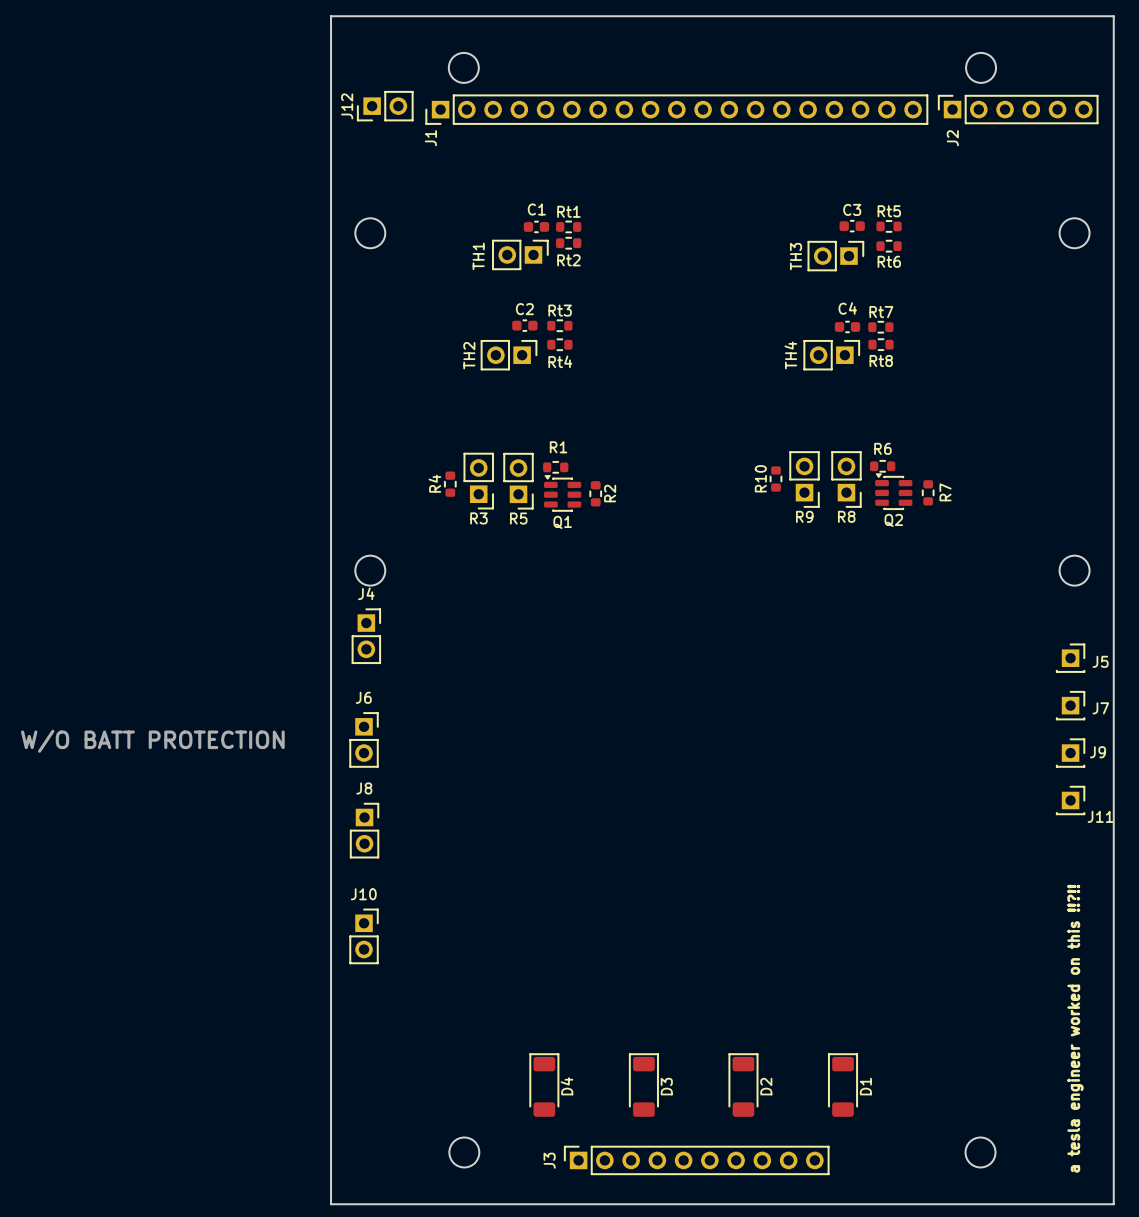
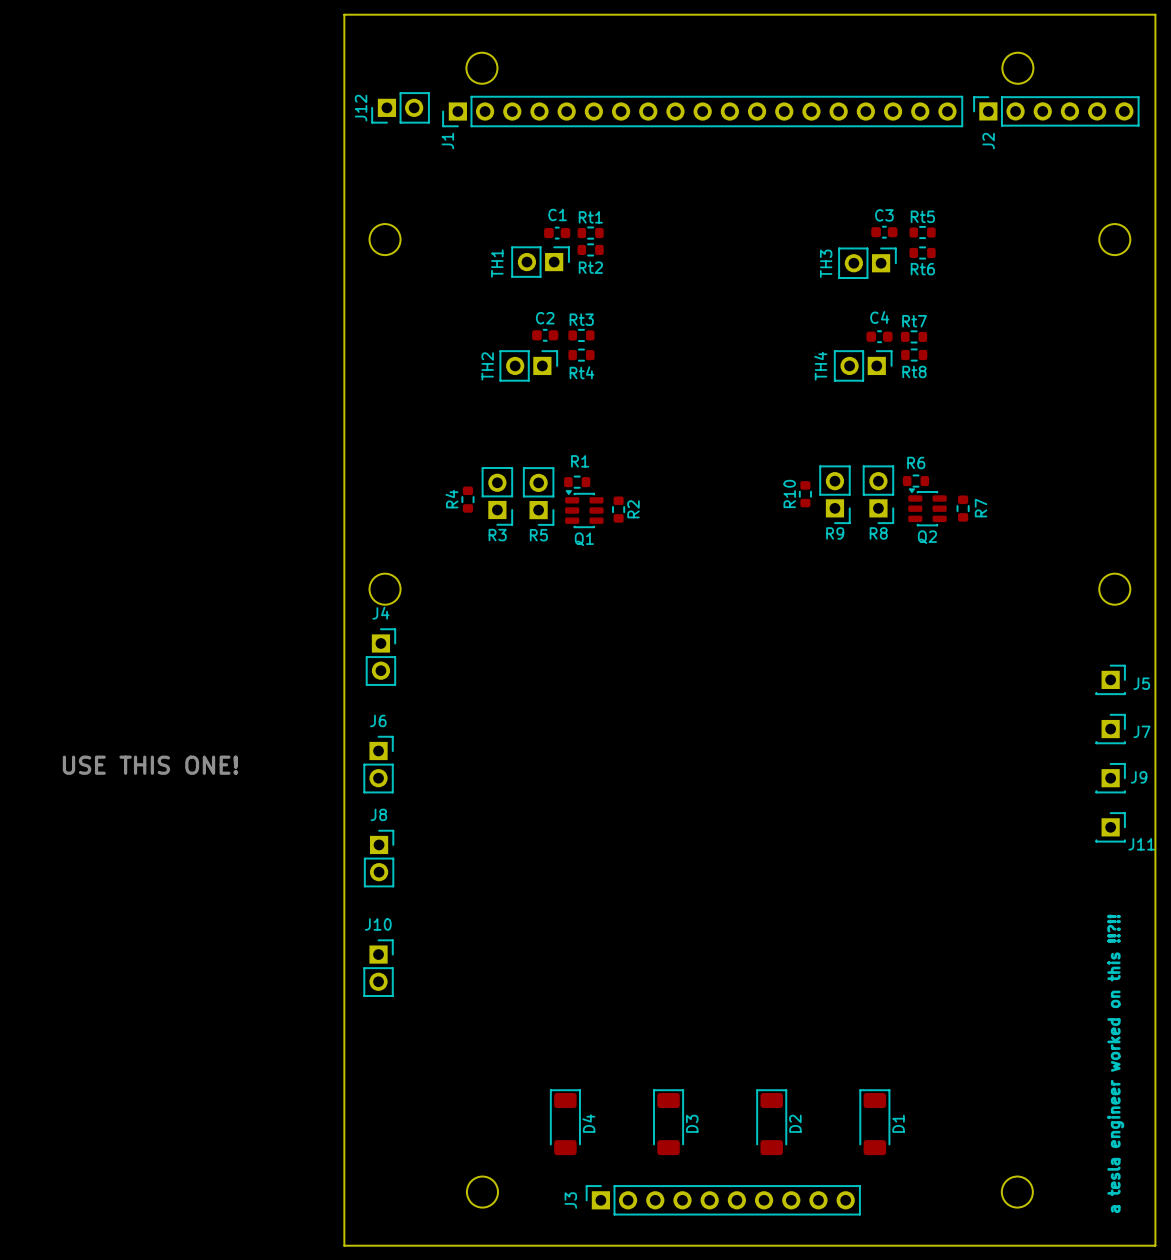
text: none -> USE THIS ONE! (150, 765)
text: W/O BATT PROTECTION (152, 741) -> none

